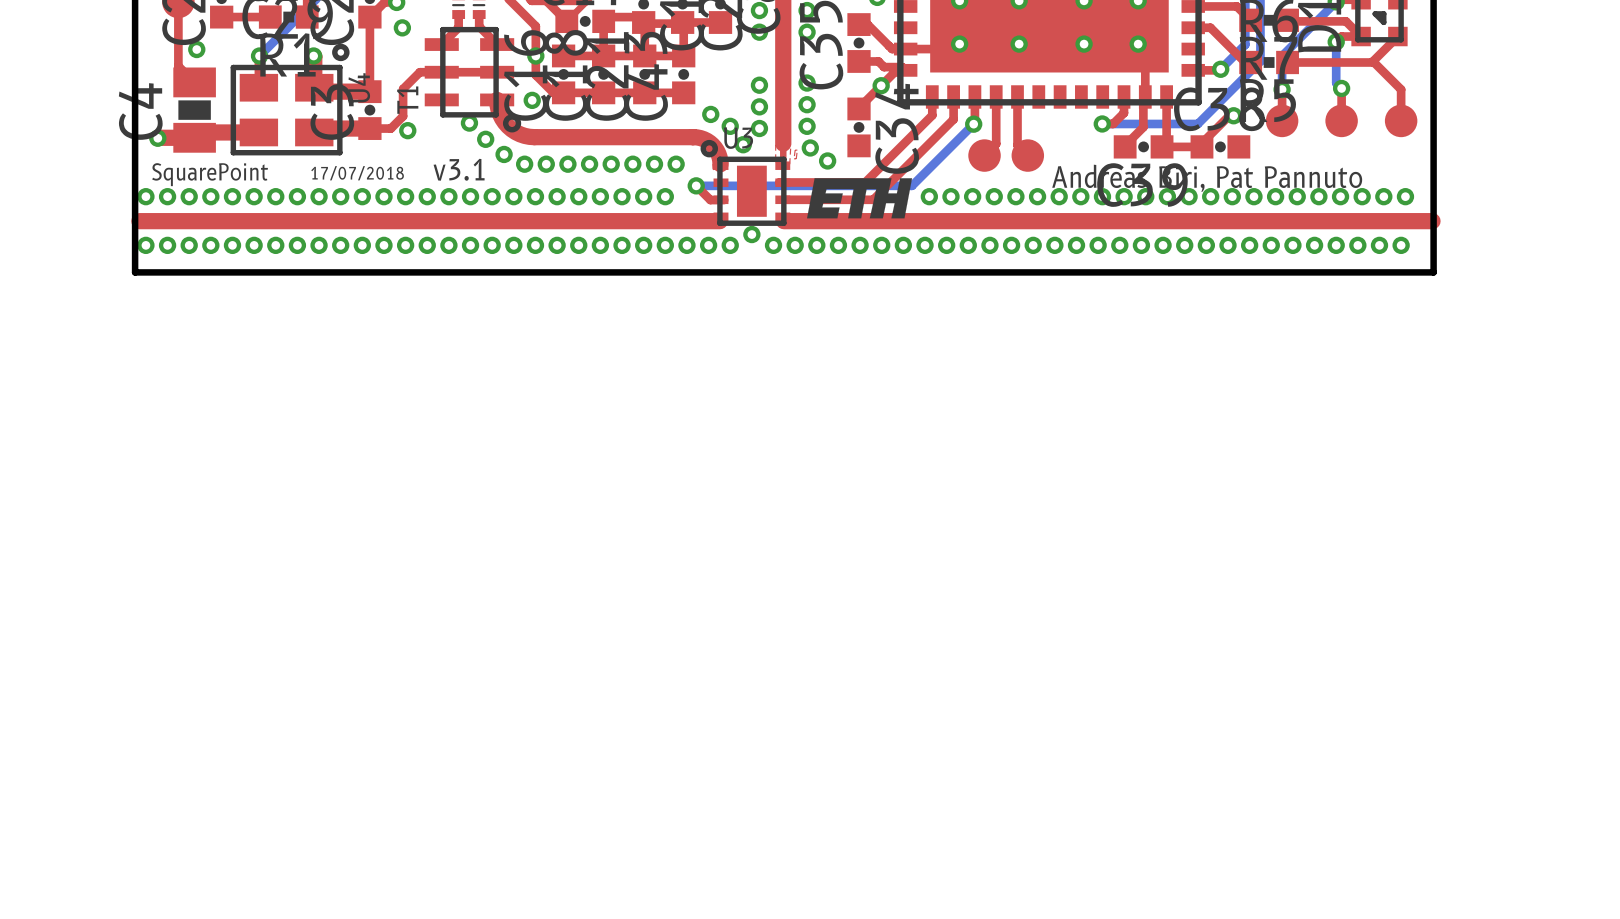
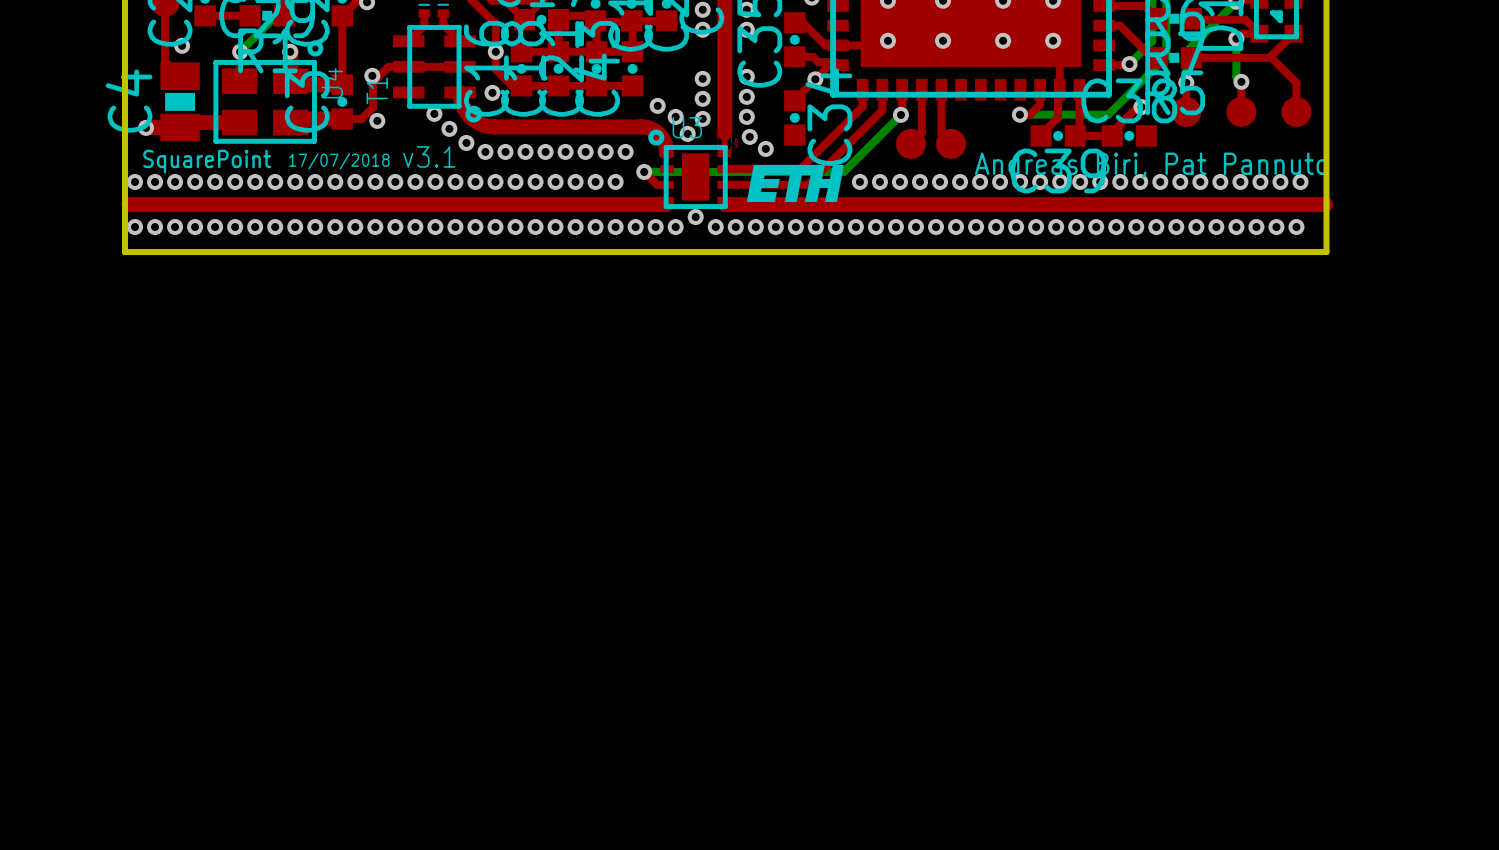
via position: (402, 27) -> (372, 75)

